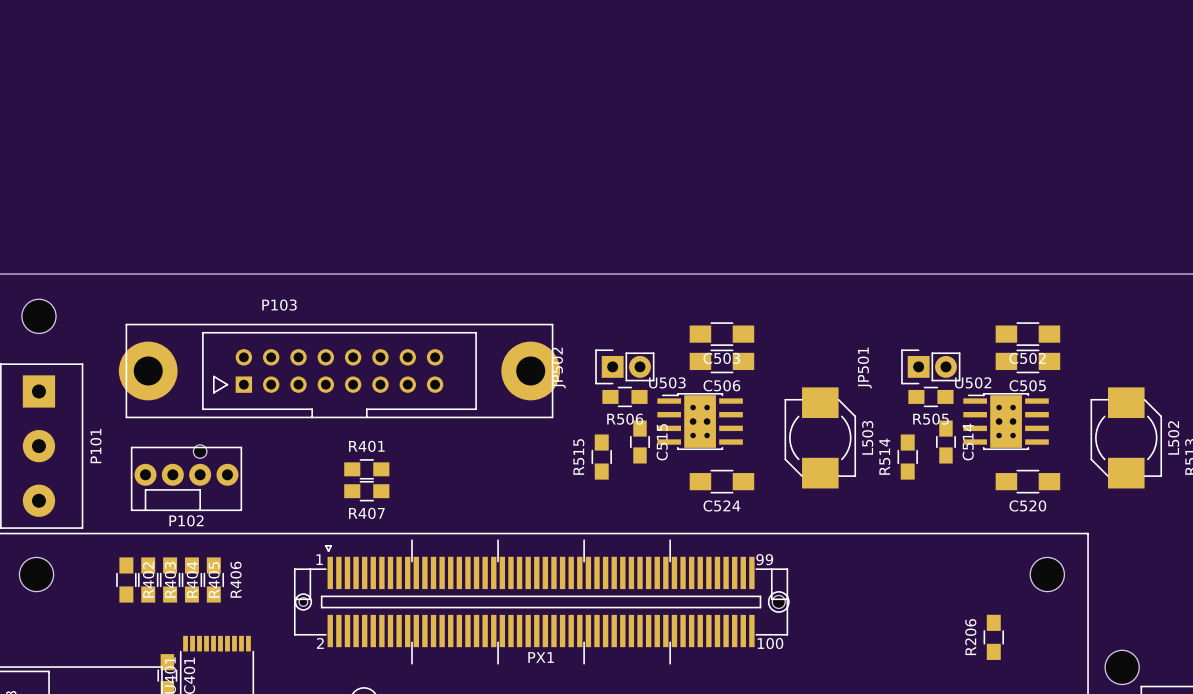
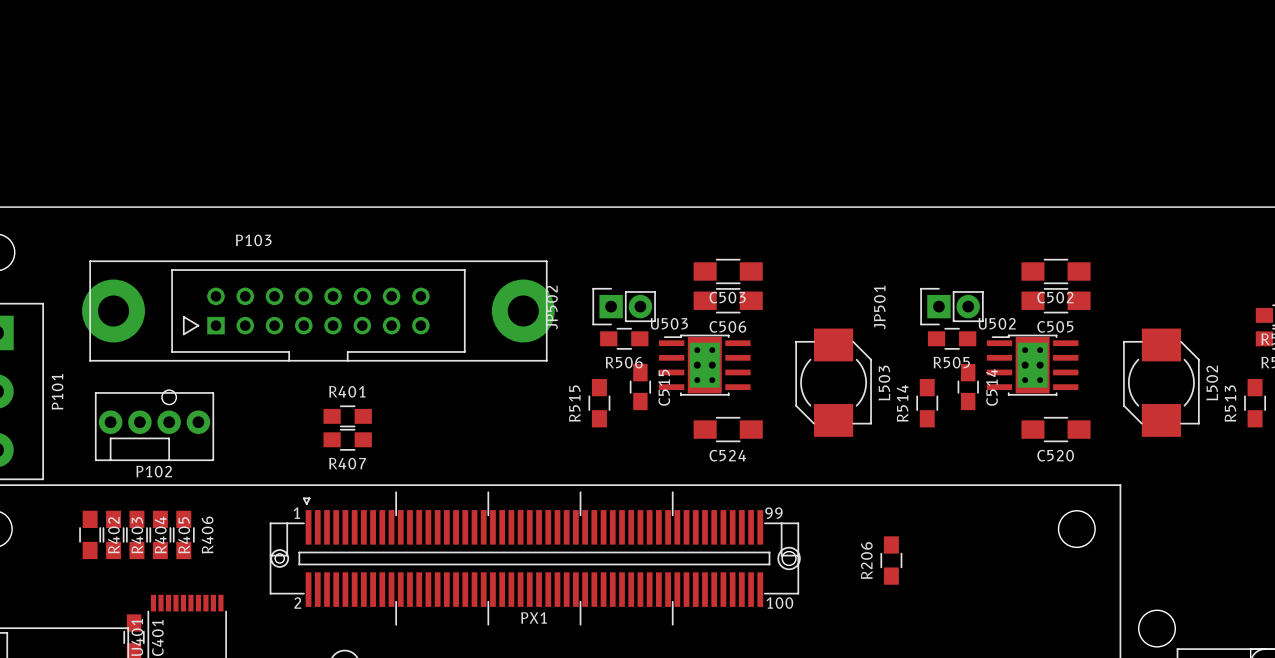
R206 position: (993, 637) -> (891, 560)

